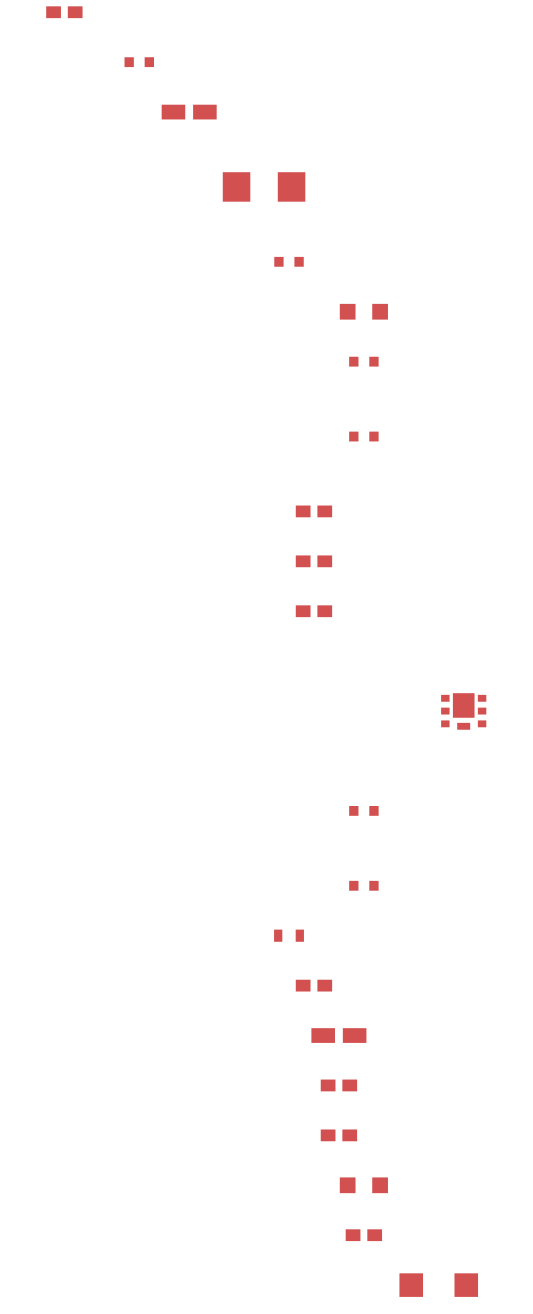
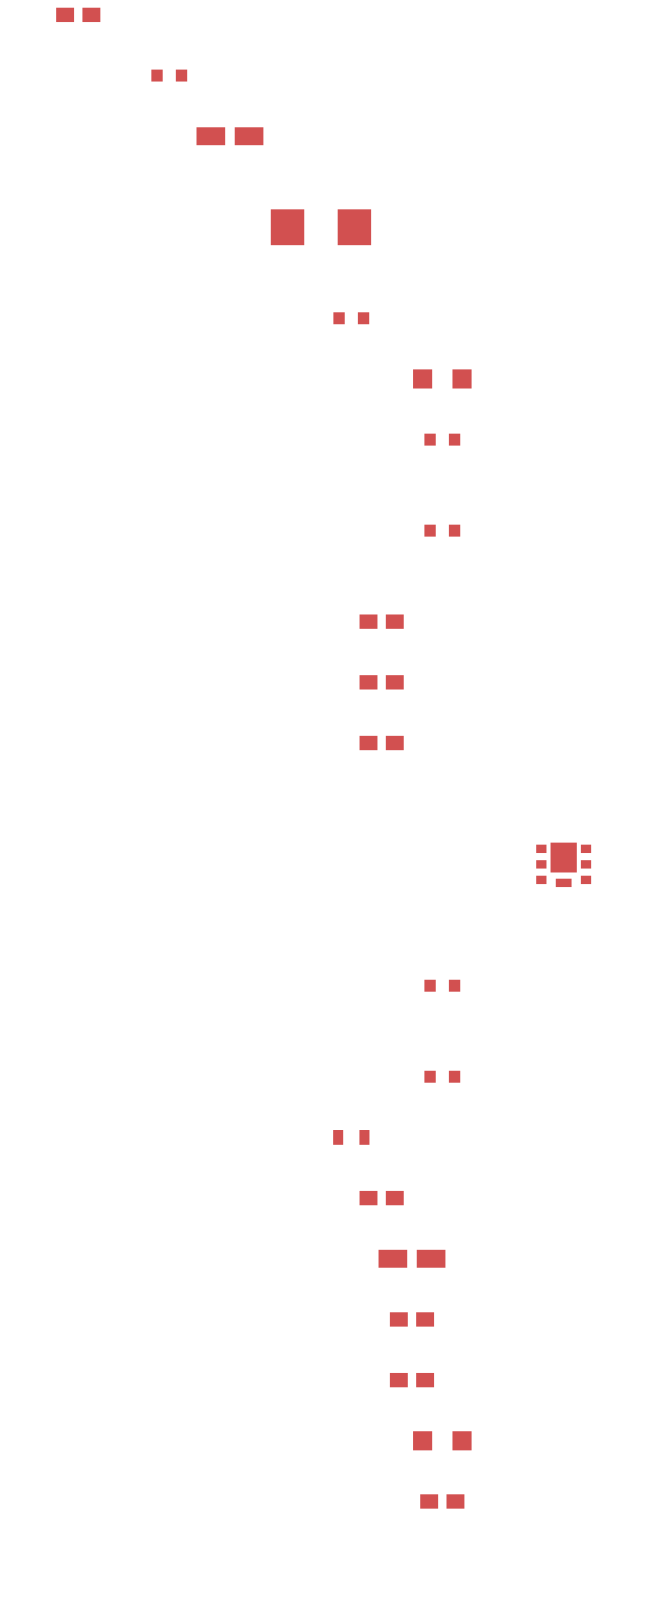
part: (438, 1285) -> none

